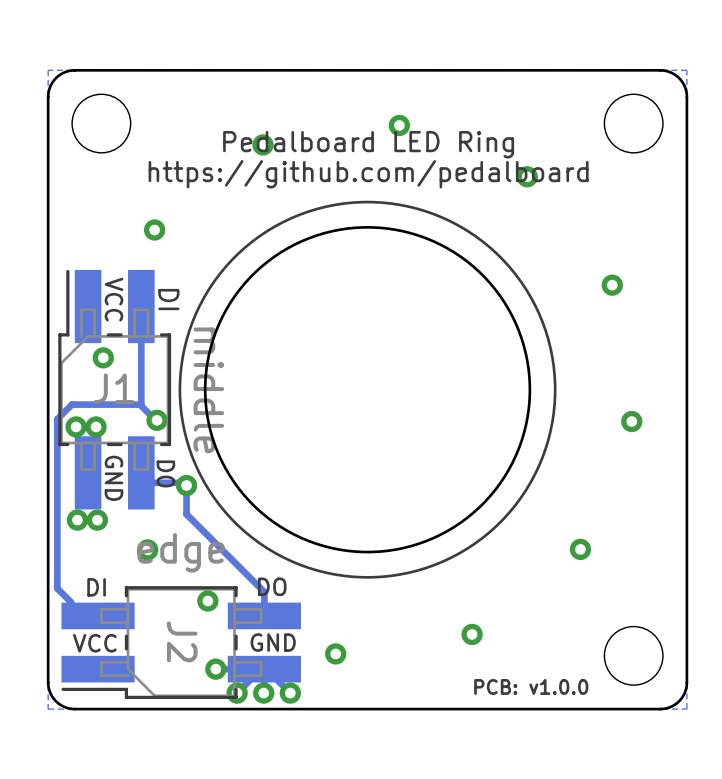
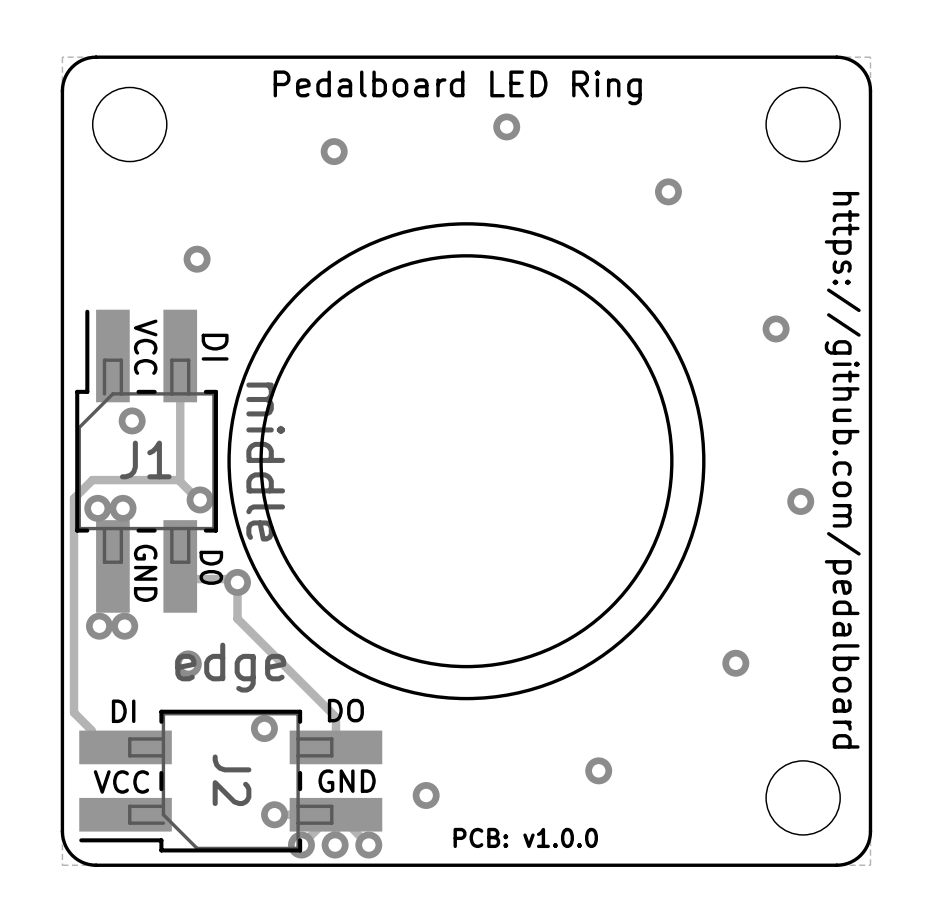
text position: Pedalboard LED Ring (368, 144) -> Pedalboard LED Ring (457, 87)
text rotation: 0° (368, 174) -> 90° clockwise (842, 470)
text position: PCB: v1.0.0 (531, 686) -> PCB: v1.0.0 (525, 837)

